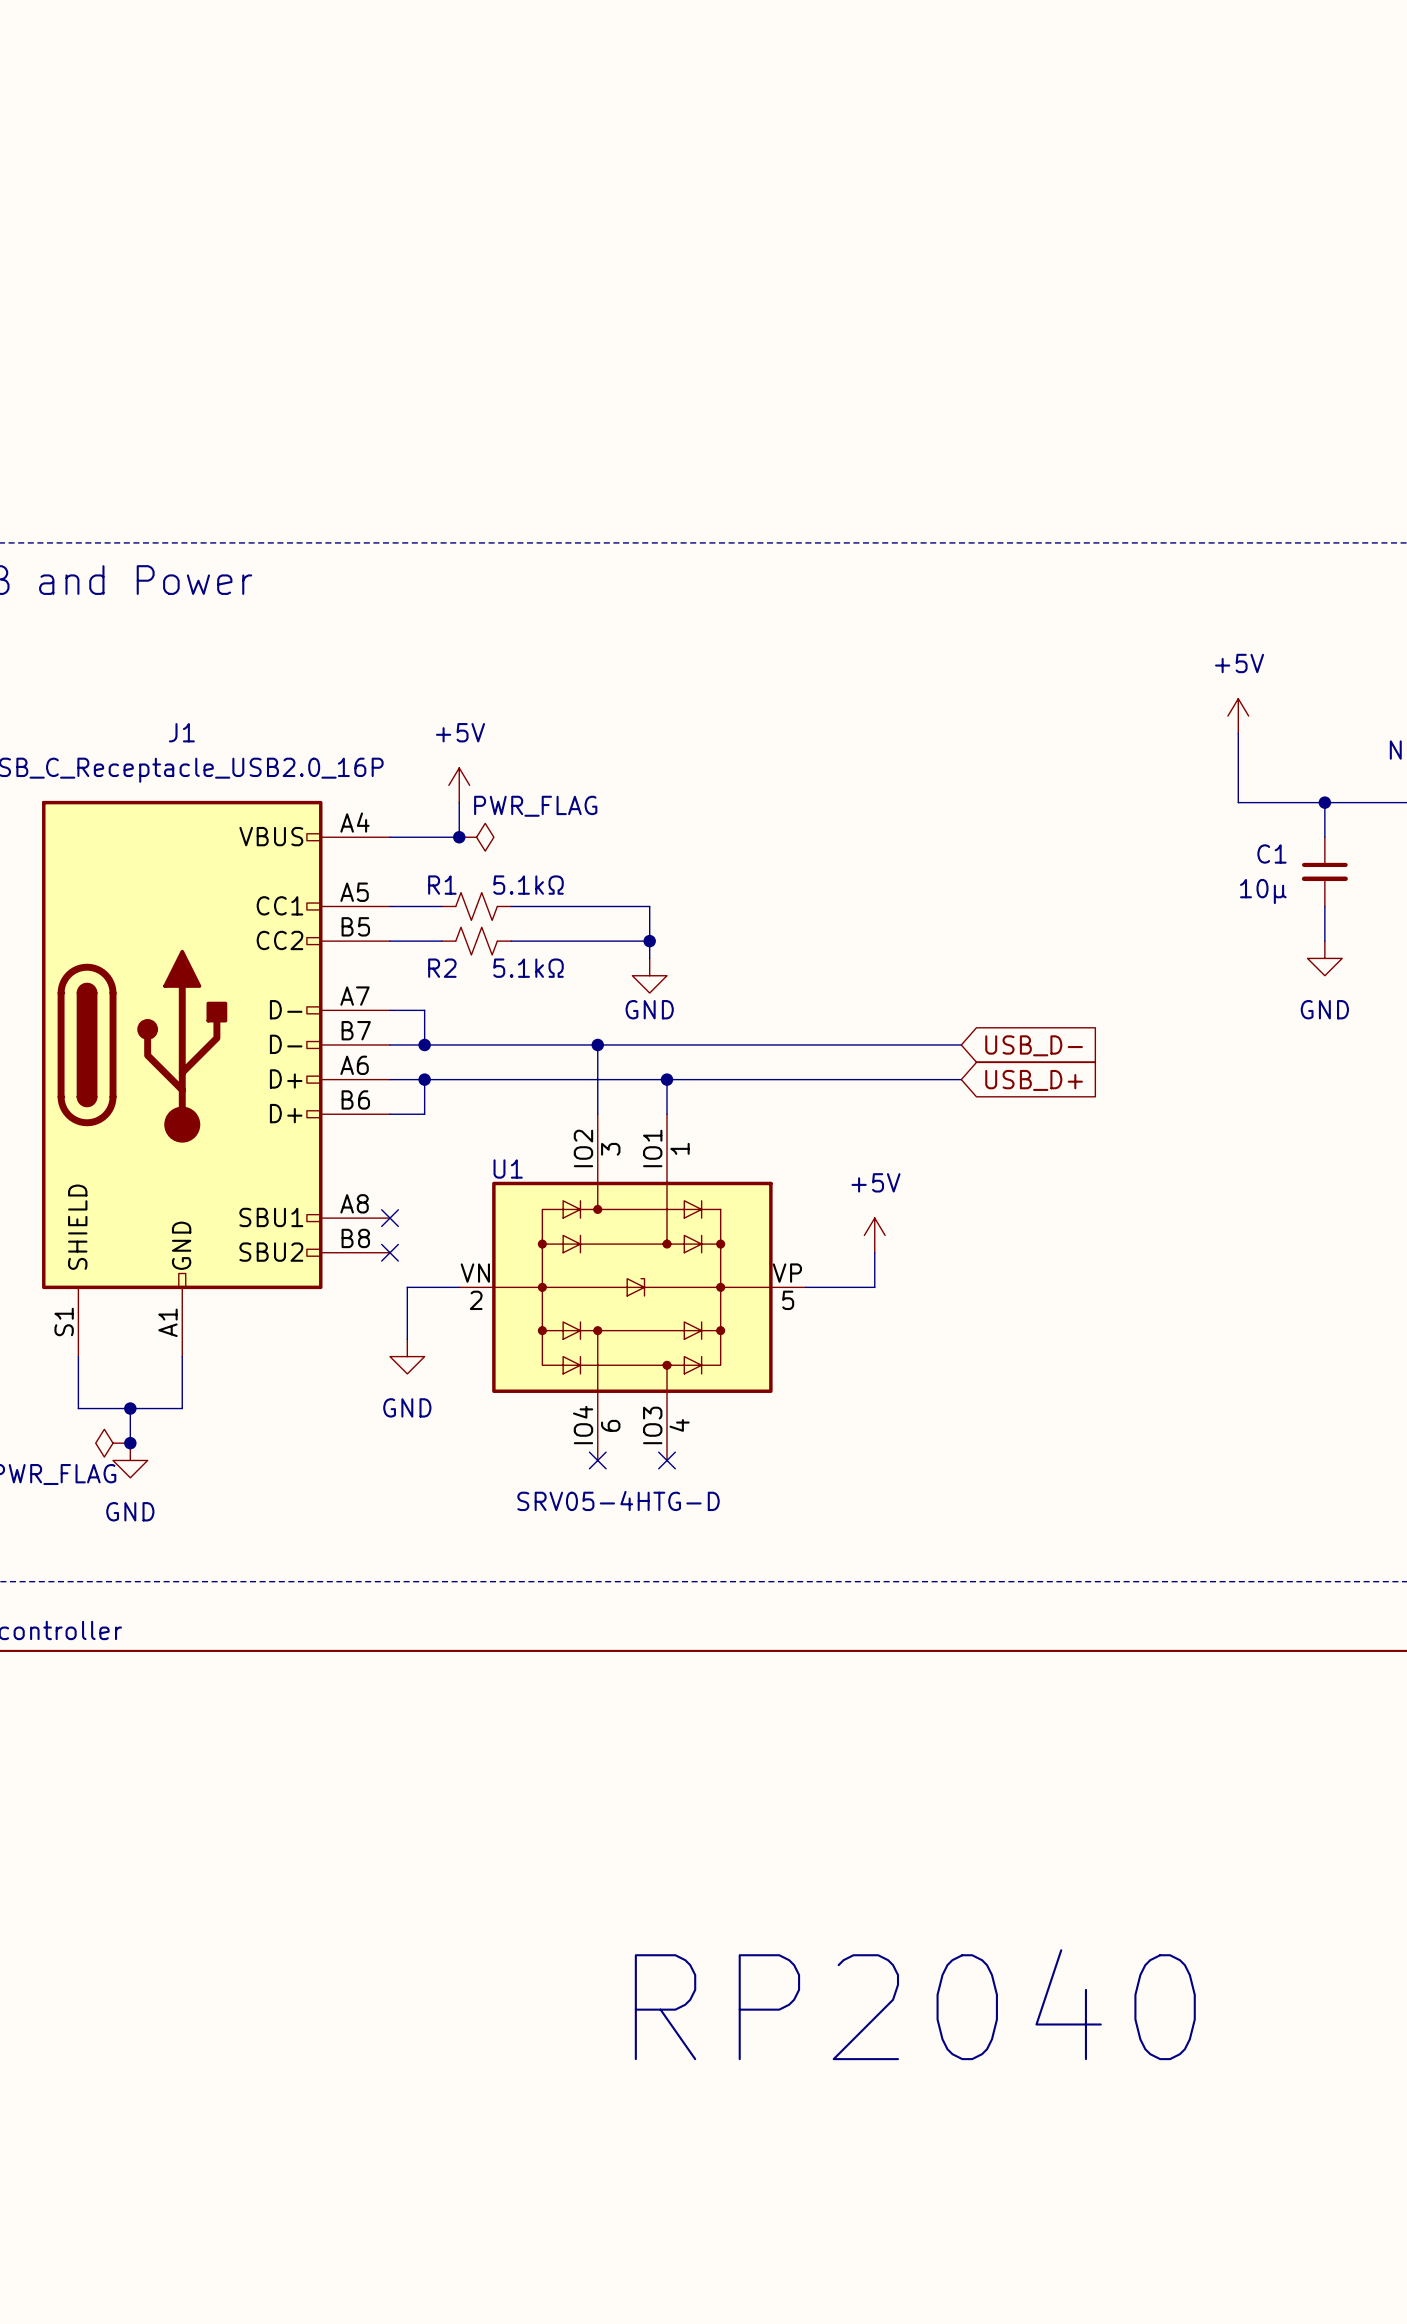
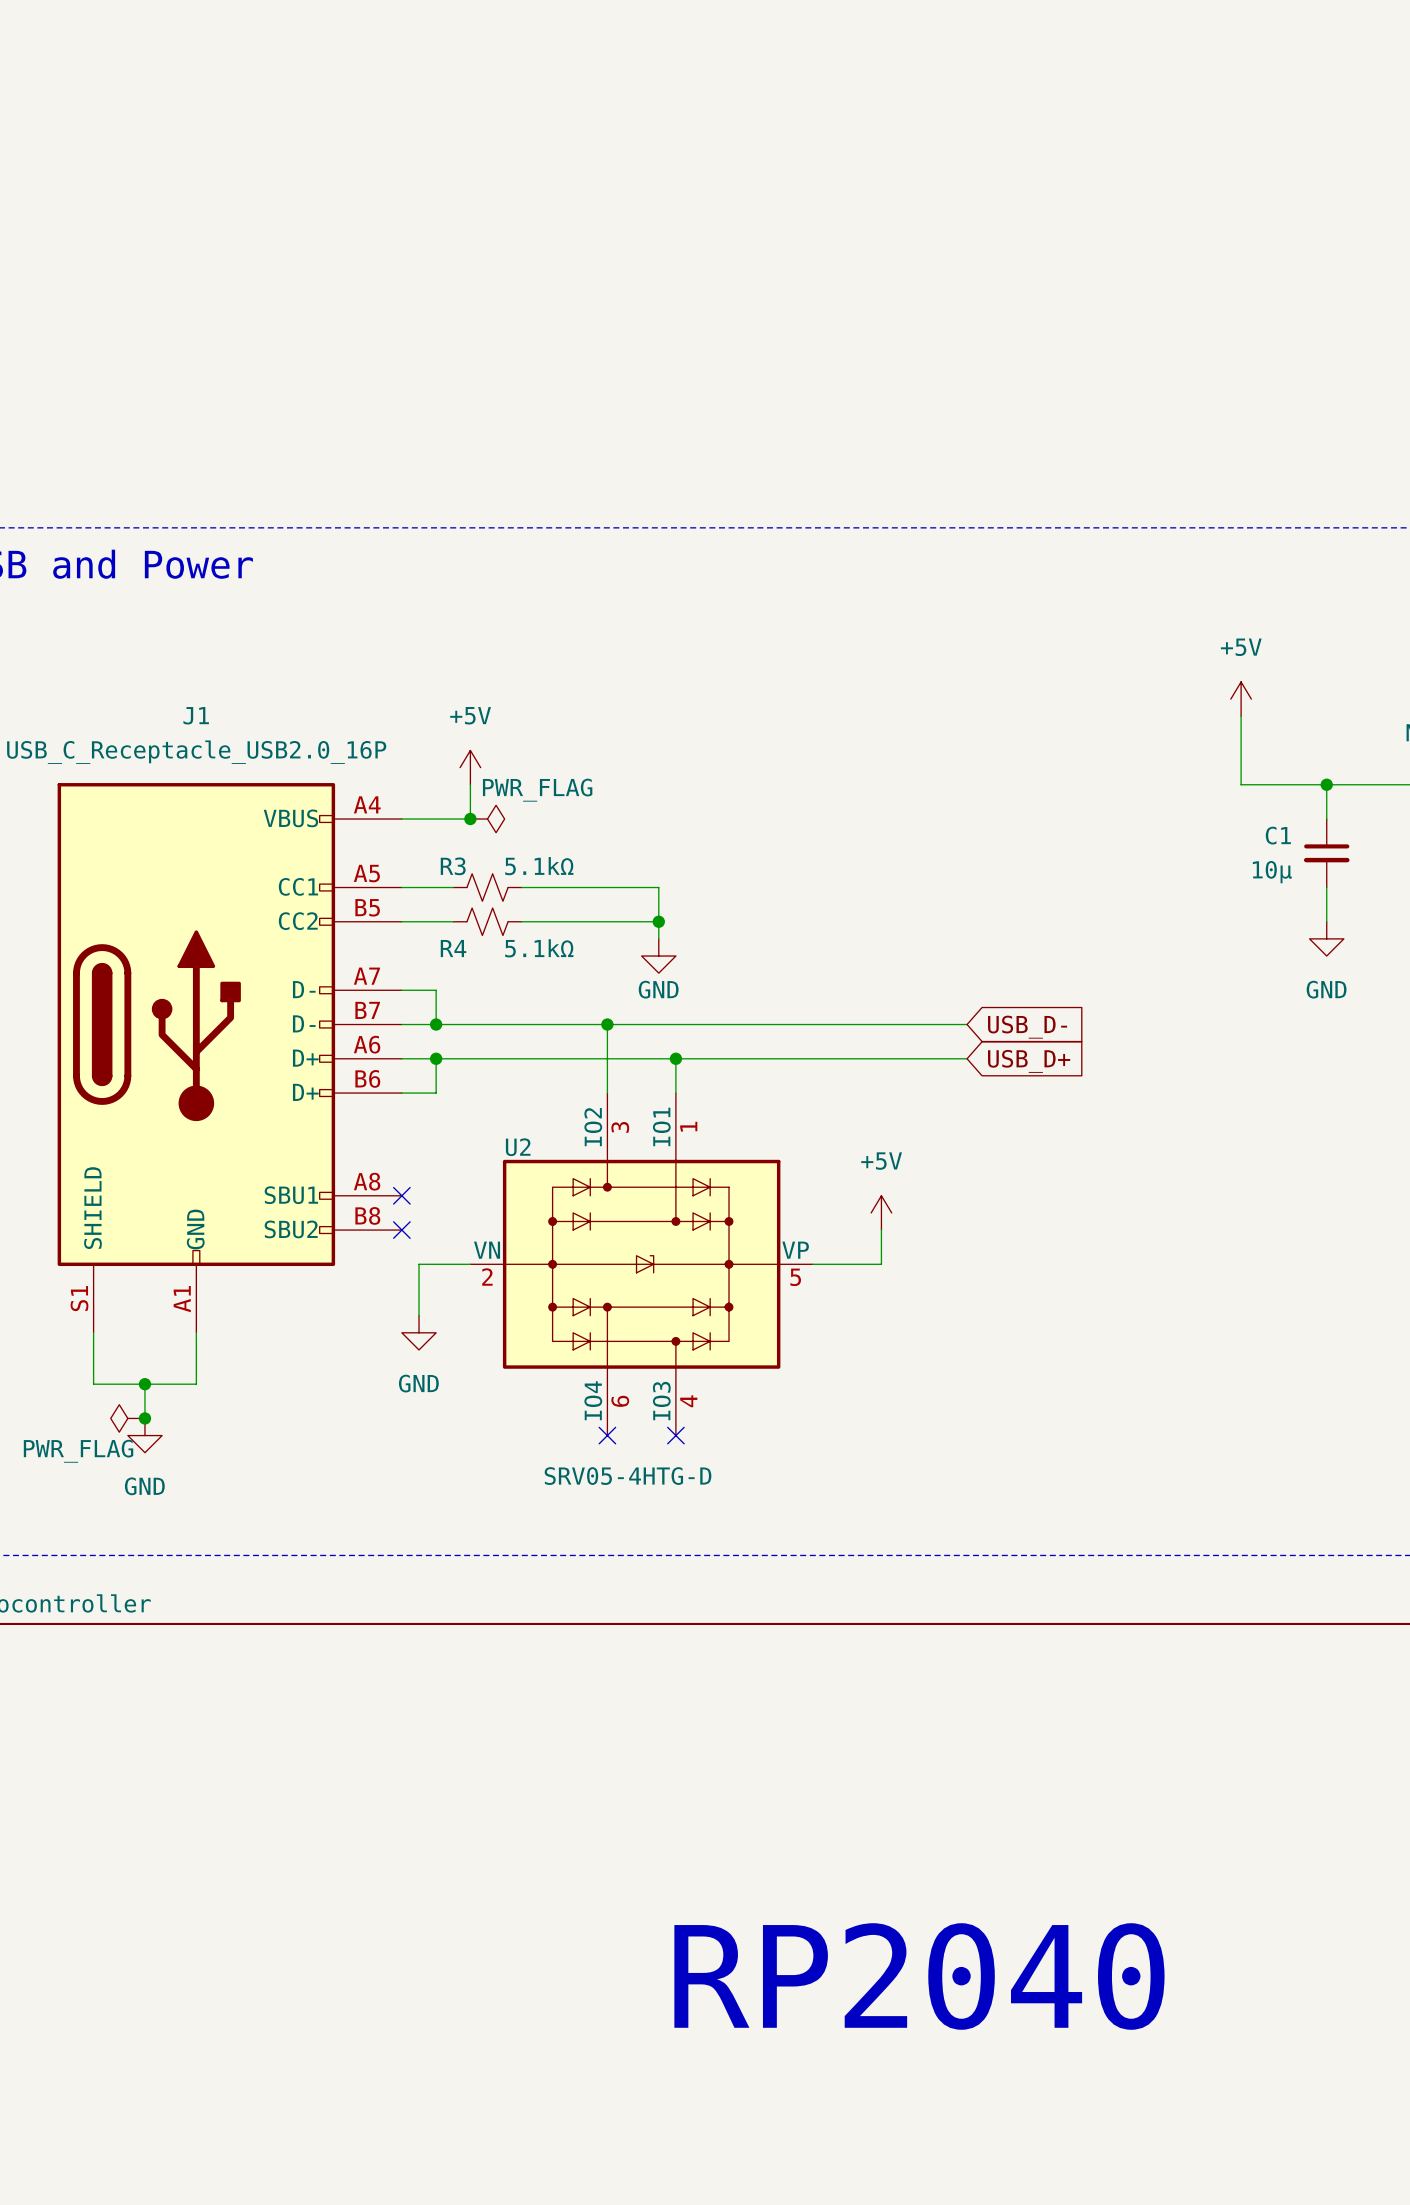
R1 name: R1 (442, 885) -> R3 (453, 866)
R2 name: R2 (442, 968) -> R4 (453, 948)
U1 name: U1 (508, 1168) -> U2 (518, 1147)

